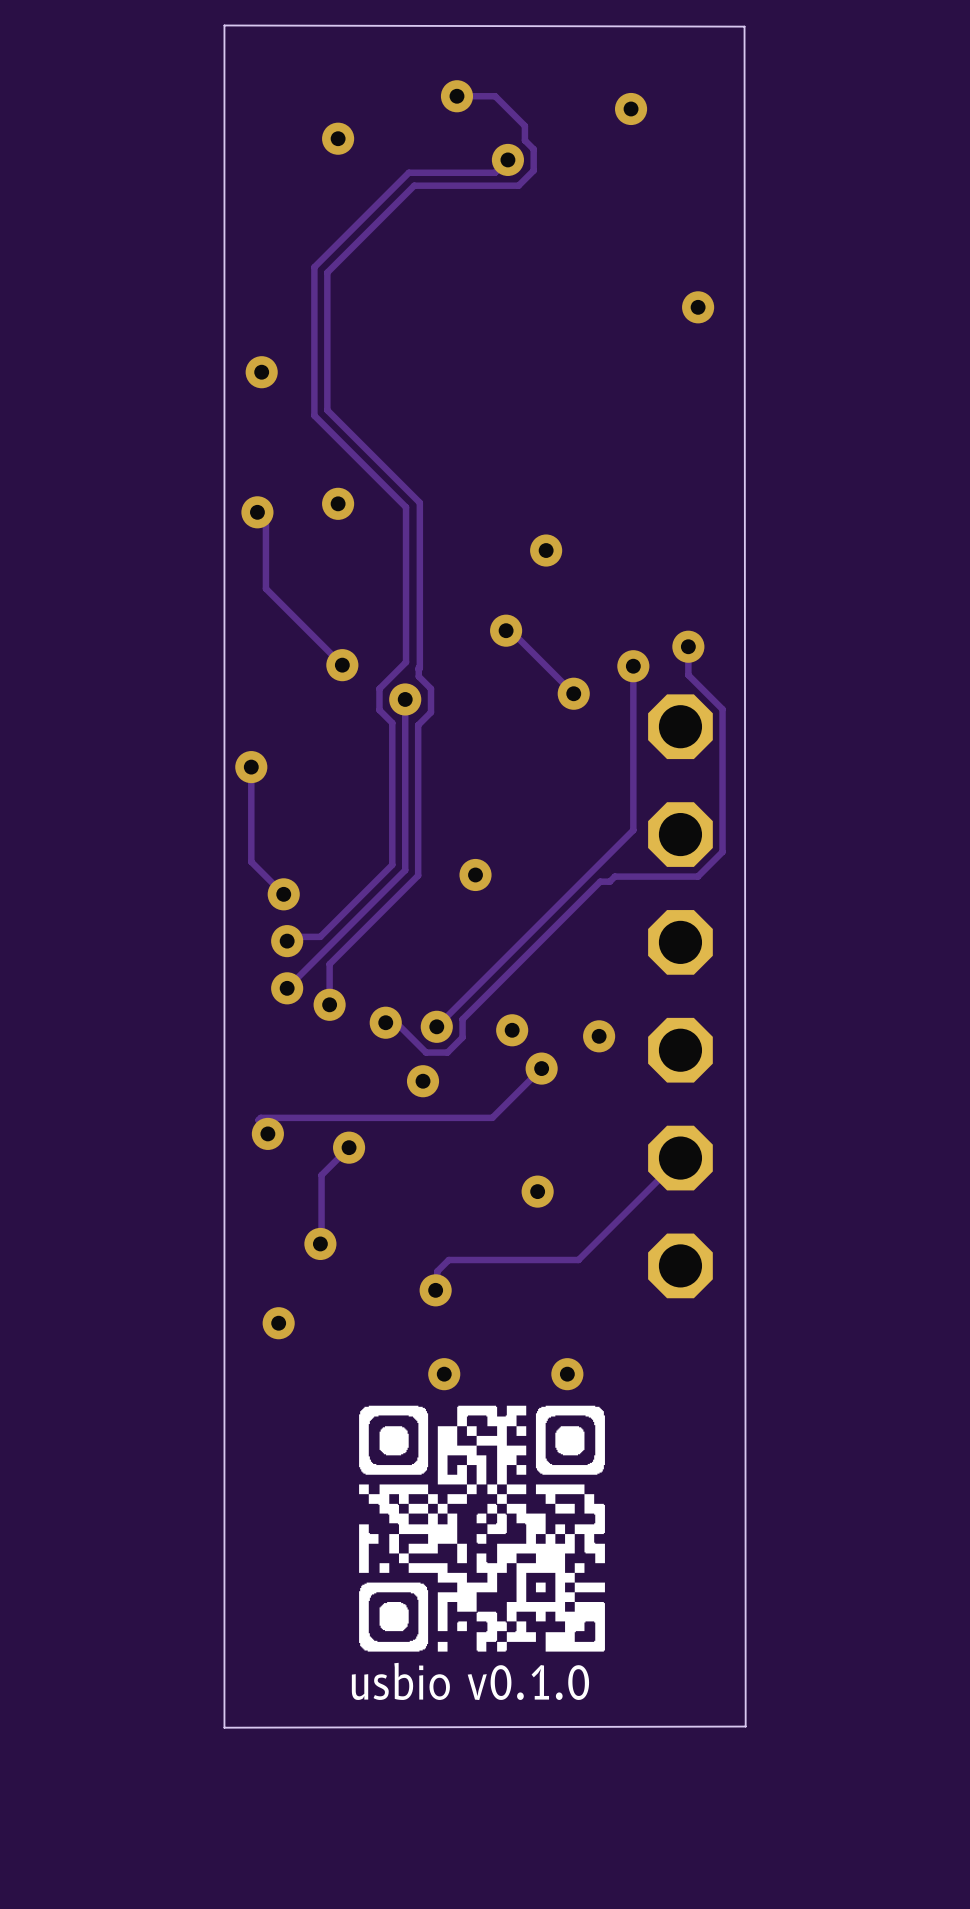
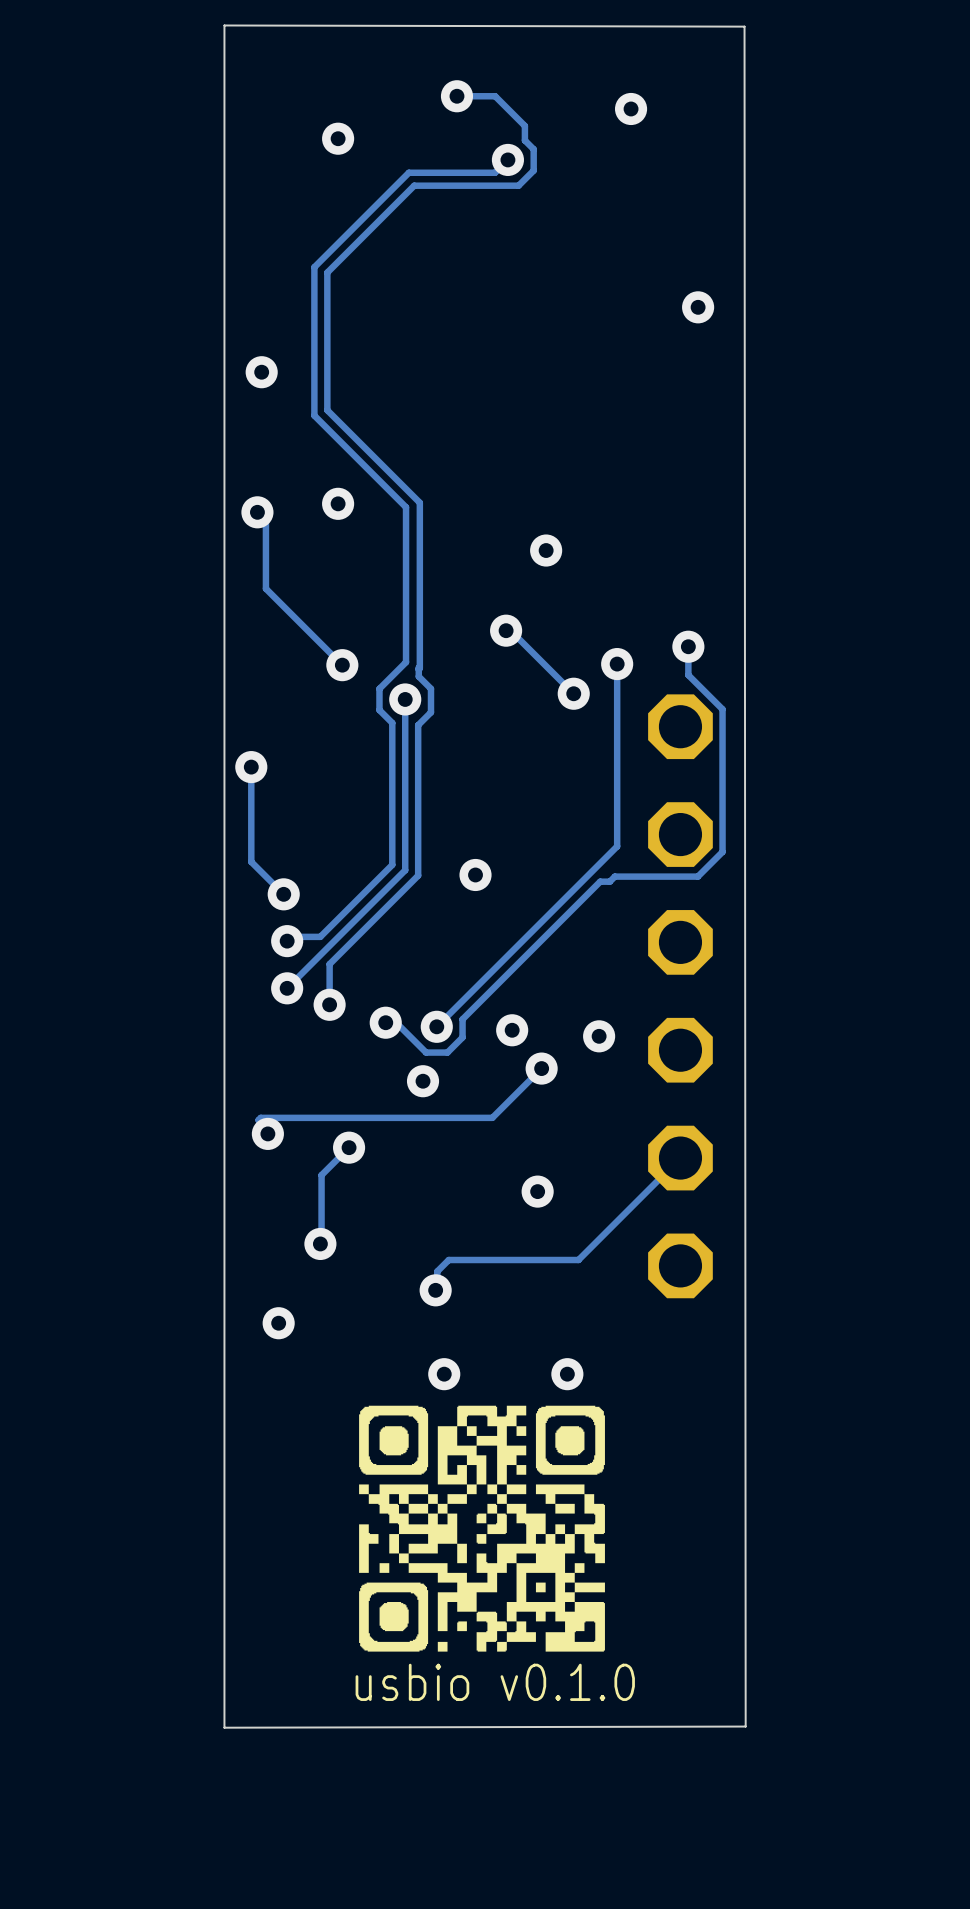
track: (633, 666) (633, 830) (617, 846) -> (617, 664) (617, 846)
via position: (633, 666) -> (617, 664)

